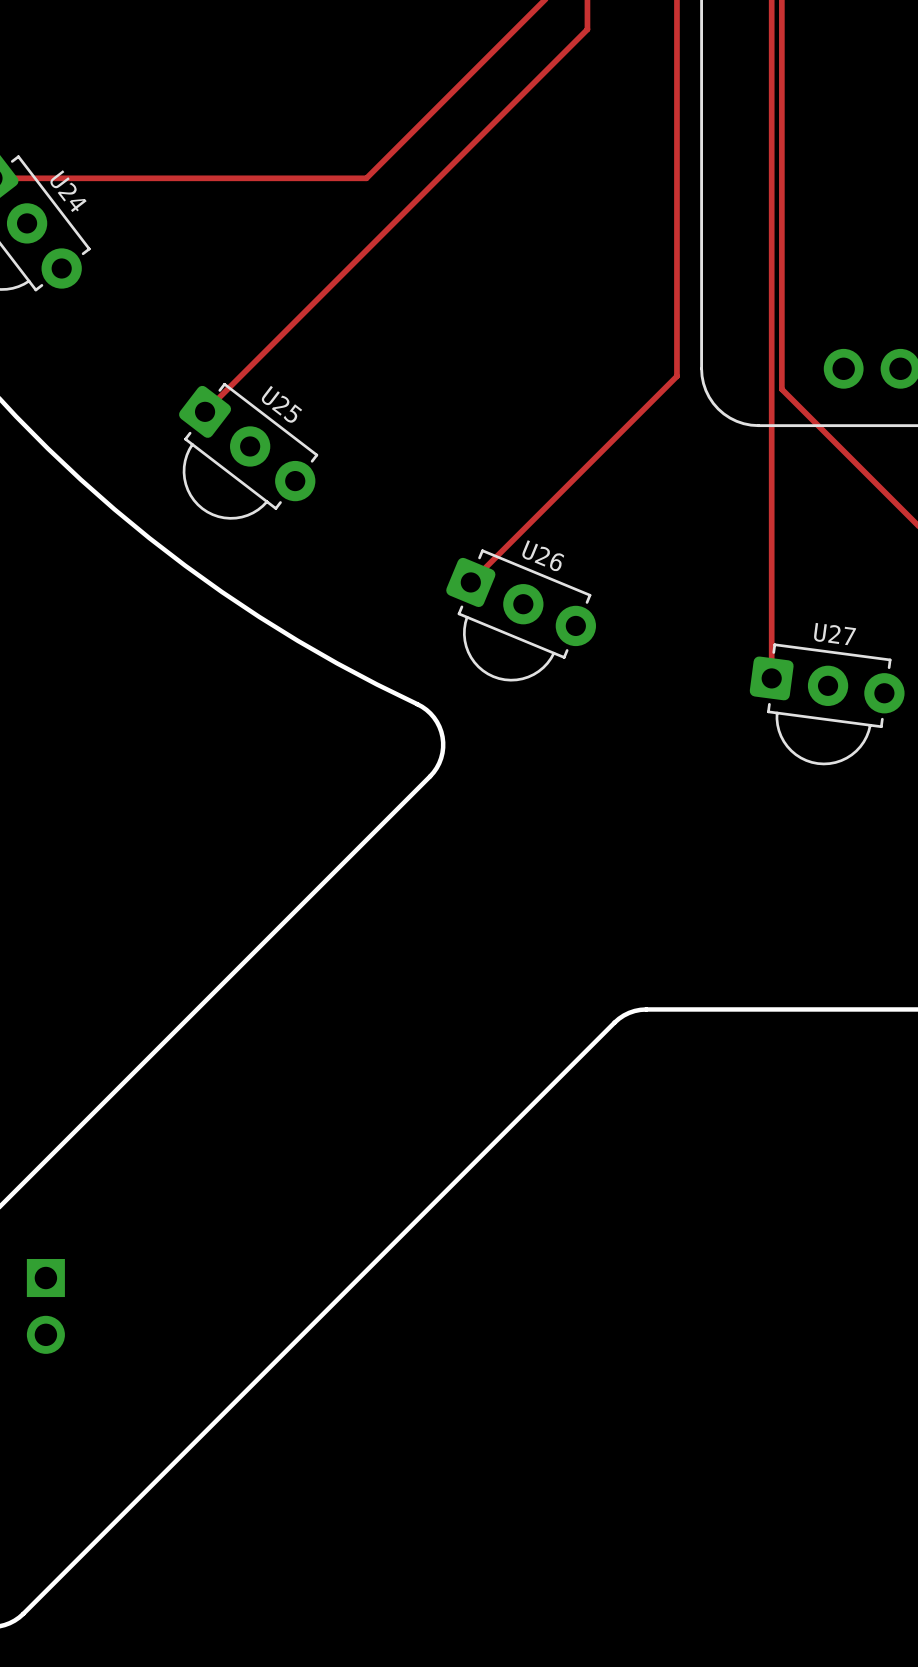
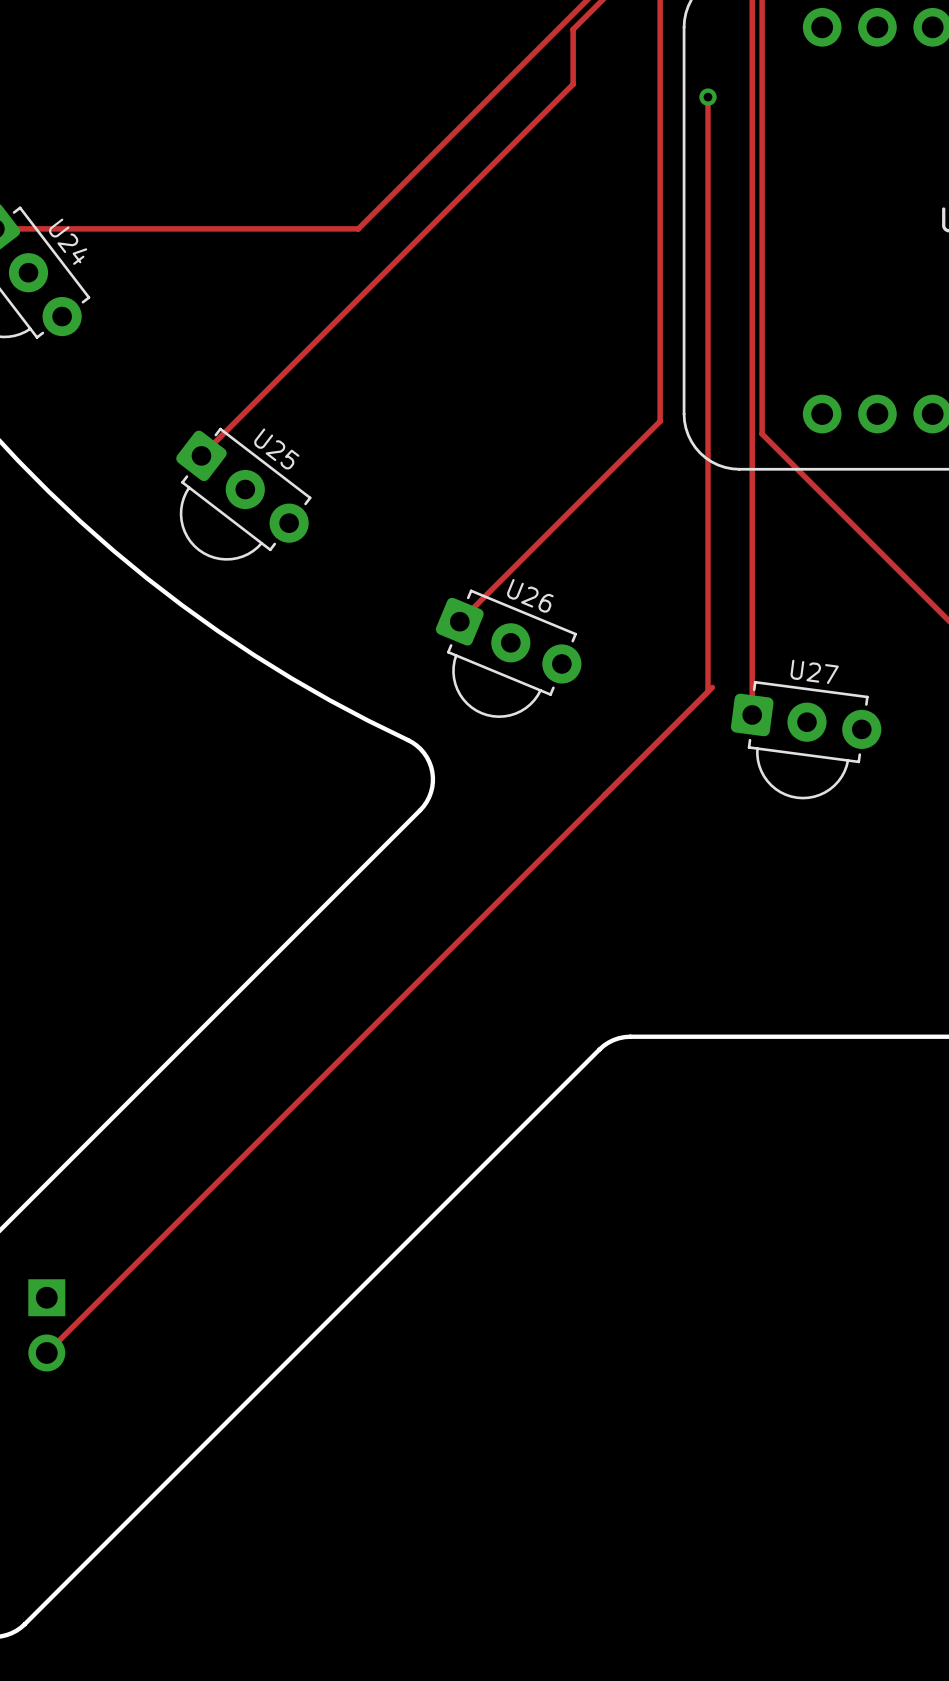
track: none -> (707, 97) (707, 691) (605, 794)
via: none -> (707, 97)
track: none -> (712, 687) (46, 1352)

